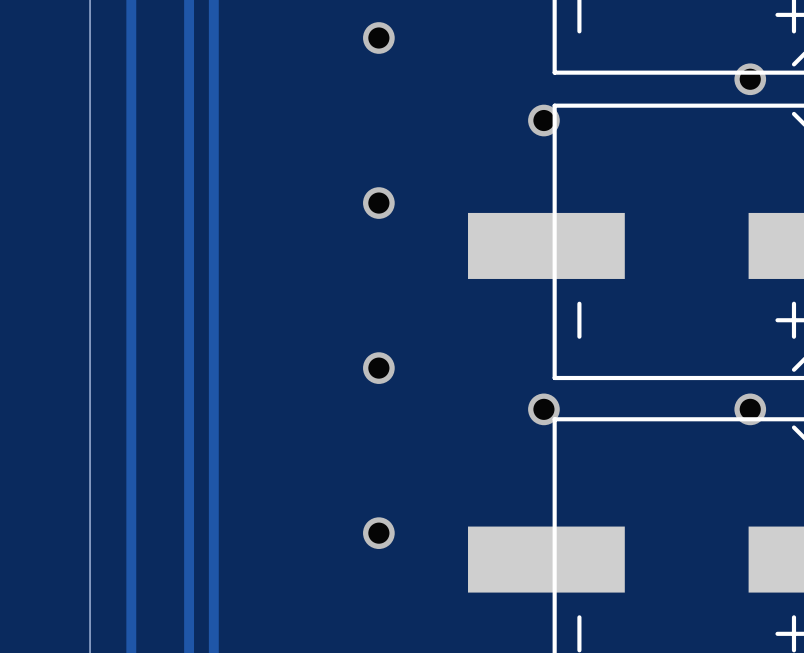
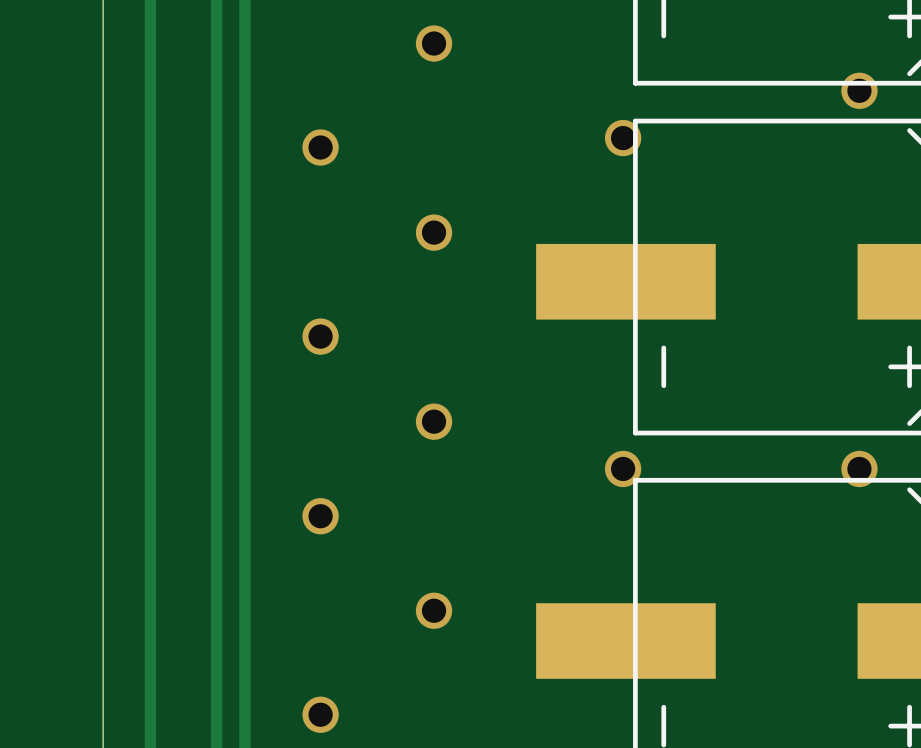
via: none -> (320, 147)
via: none -> (320, 336)
via: none -> (320, 516)
via: none -> (320, 714)

